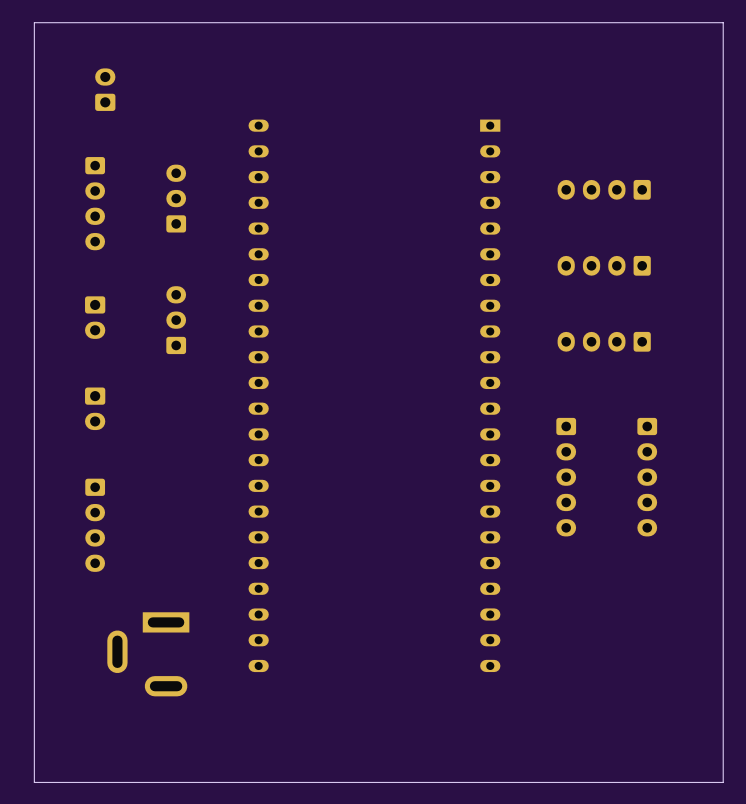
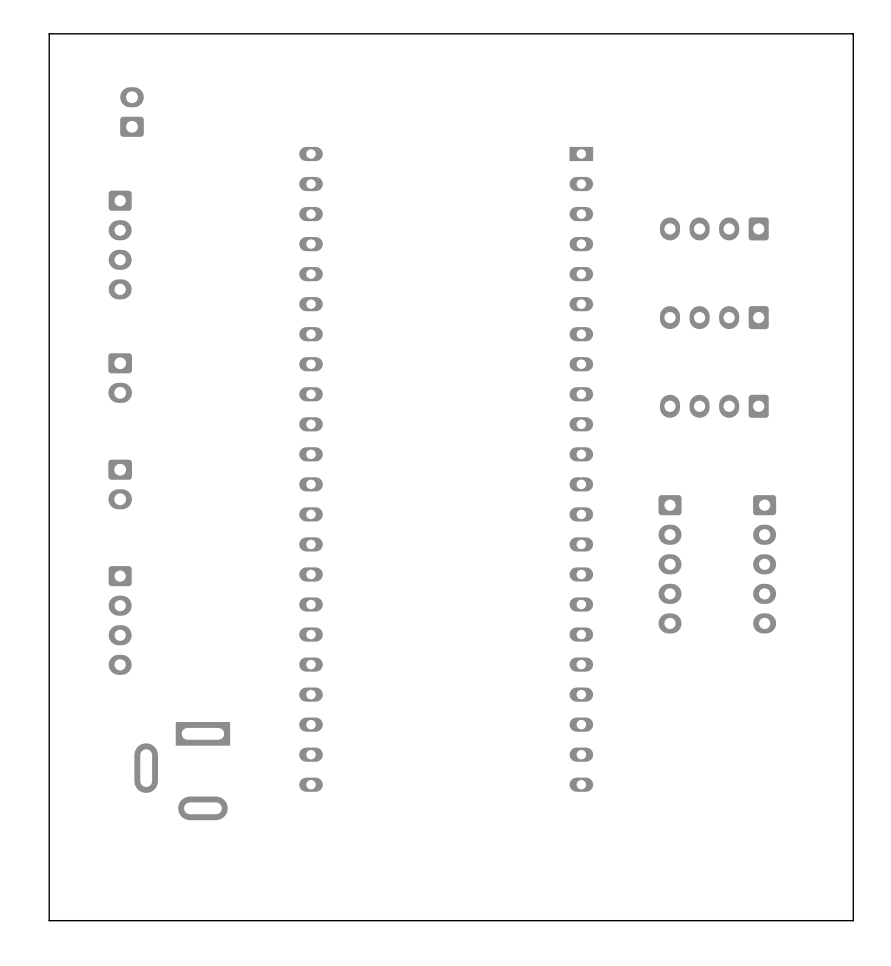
part: (176, 198) -> none
part: (176, 320) -> none

